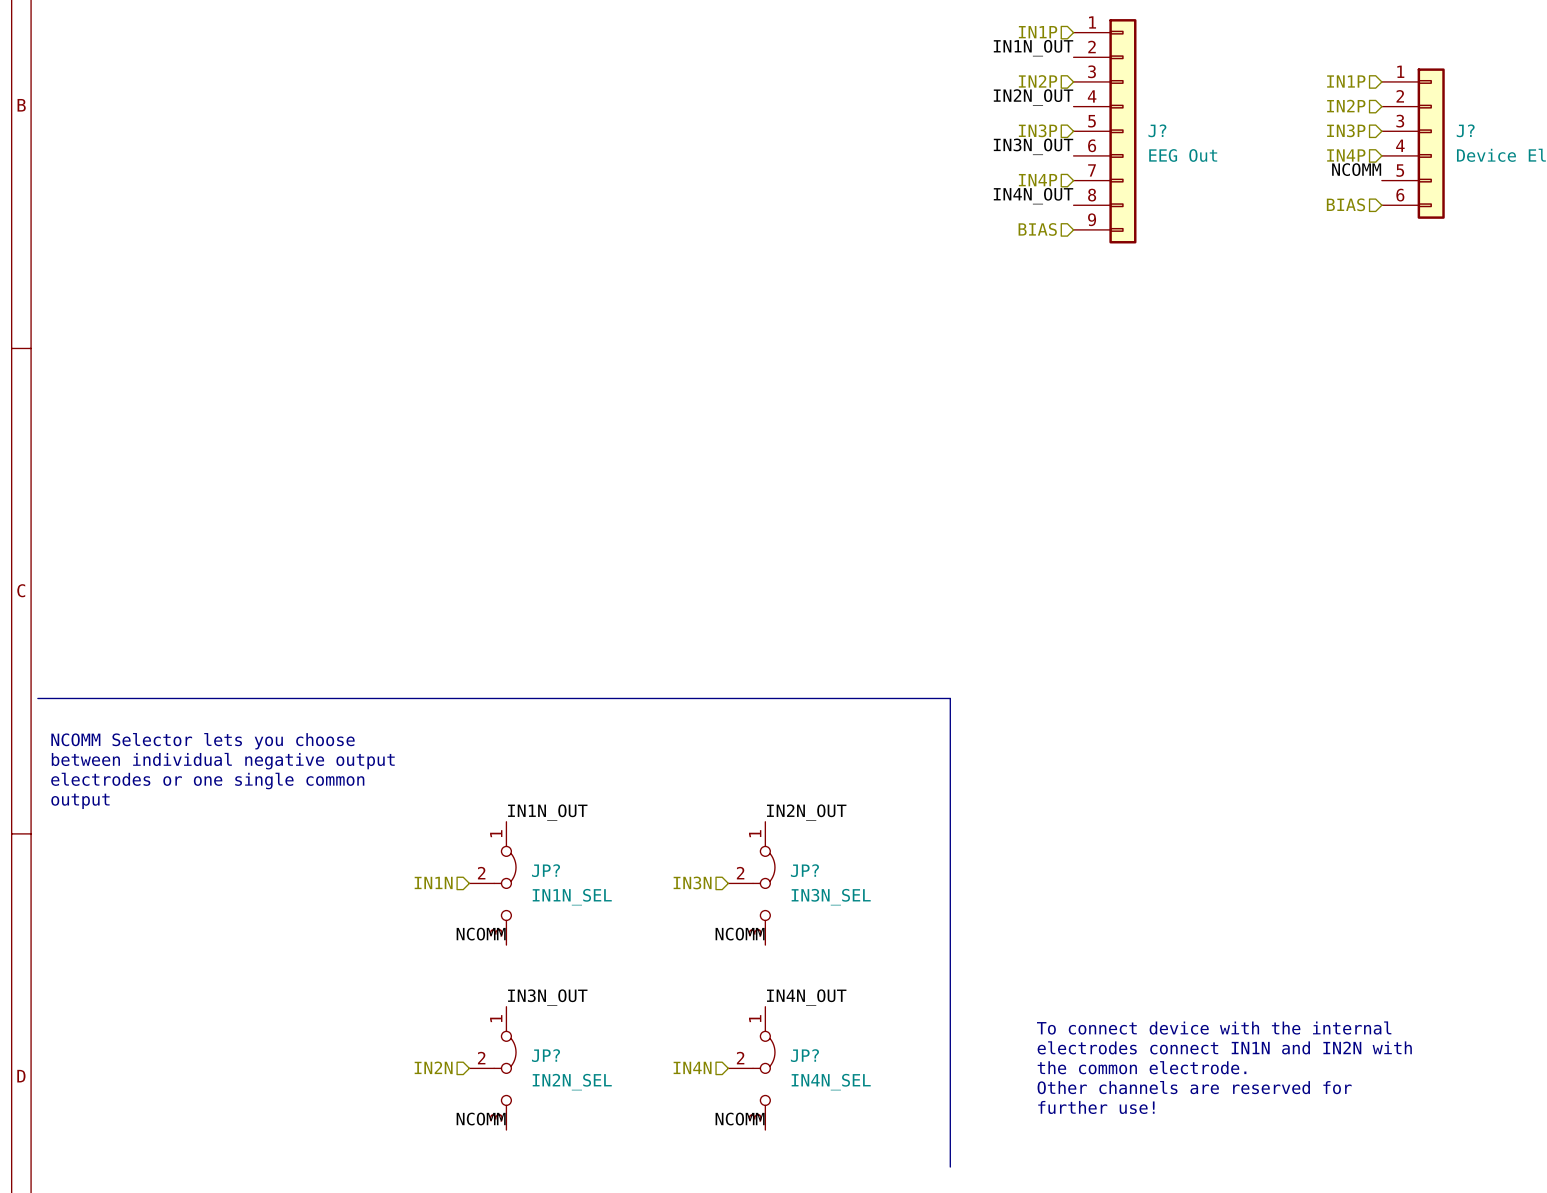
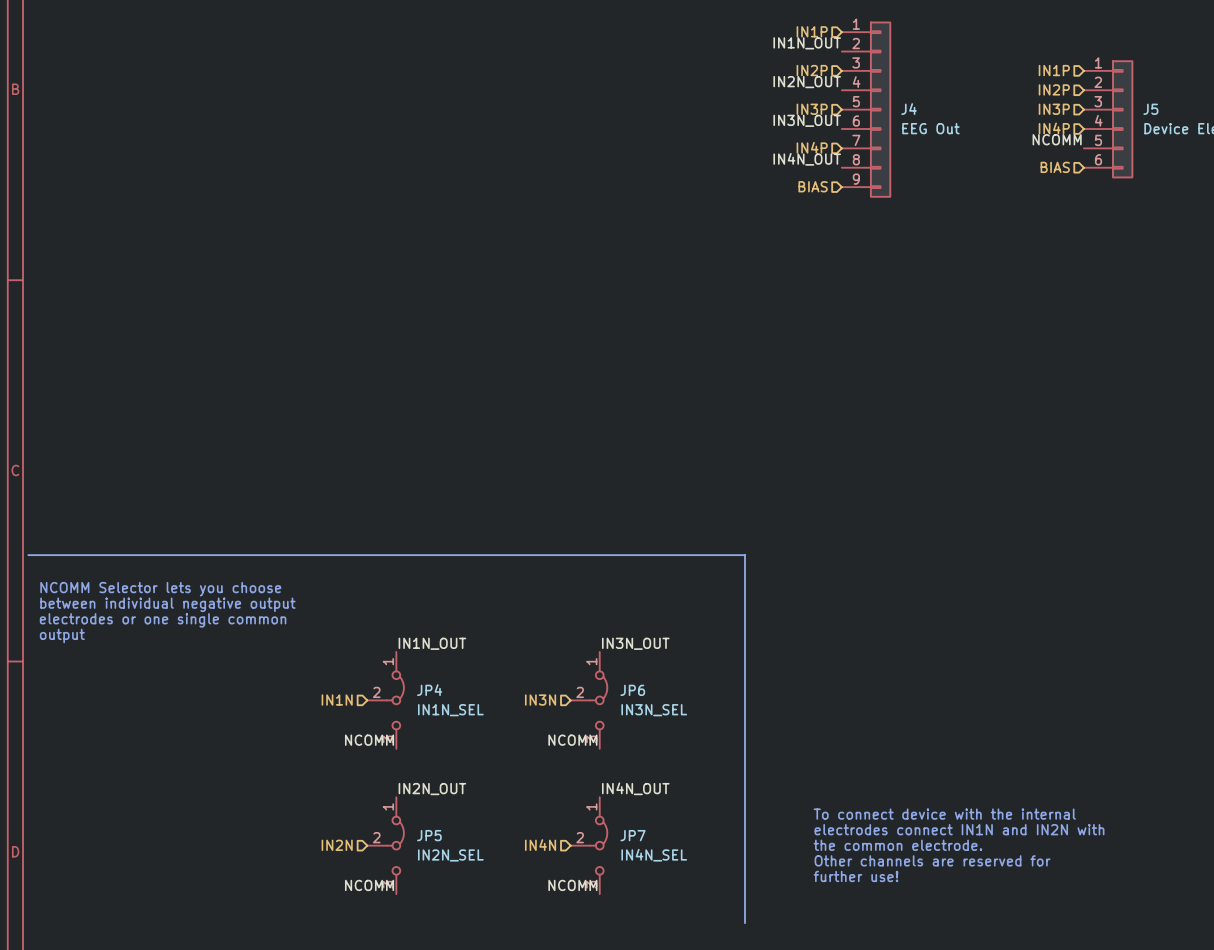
J? name: J? (1157, 130) -> J4 (909, 109)
J? name: J? (1465, 130) -> J5 (1150, 109)
label: IN2N_OUT (806, 812) -> IN3N_OUT (635, 643)
JP? name: JP? (546, 870) -> JP4 (429, 690)
JP? name: JP? (804, 870) -> JP6 (632, 690)
label: IN3N_OUT (547, 997) -> IN2N_OUT (432, 789)
JP? name: JP? (546, 1055) -> JP5 (429, 835)
JP? name: JP? (804, 1055) -> JP7 (633, 835)

